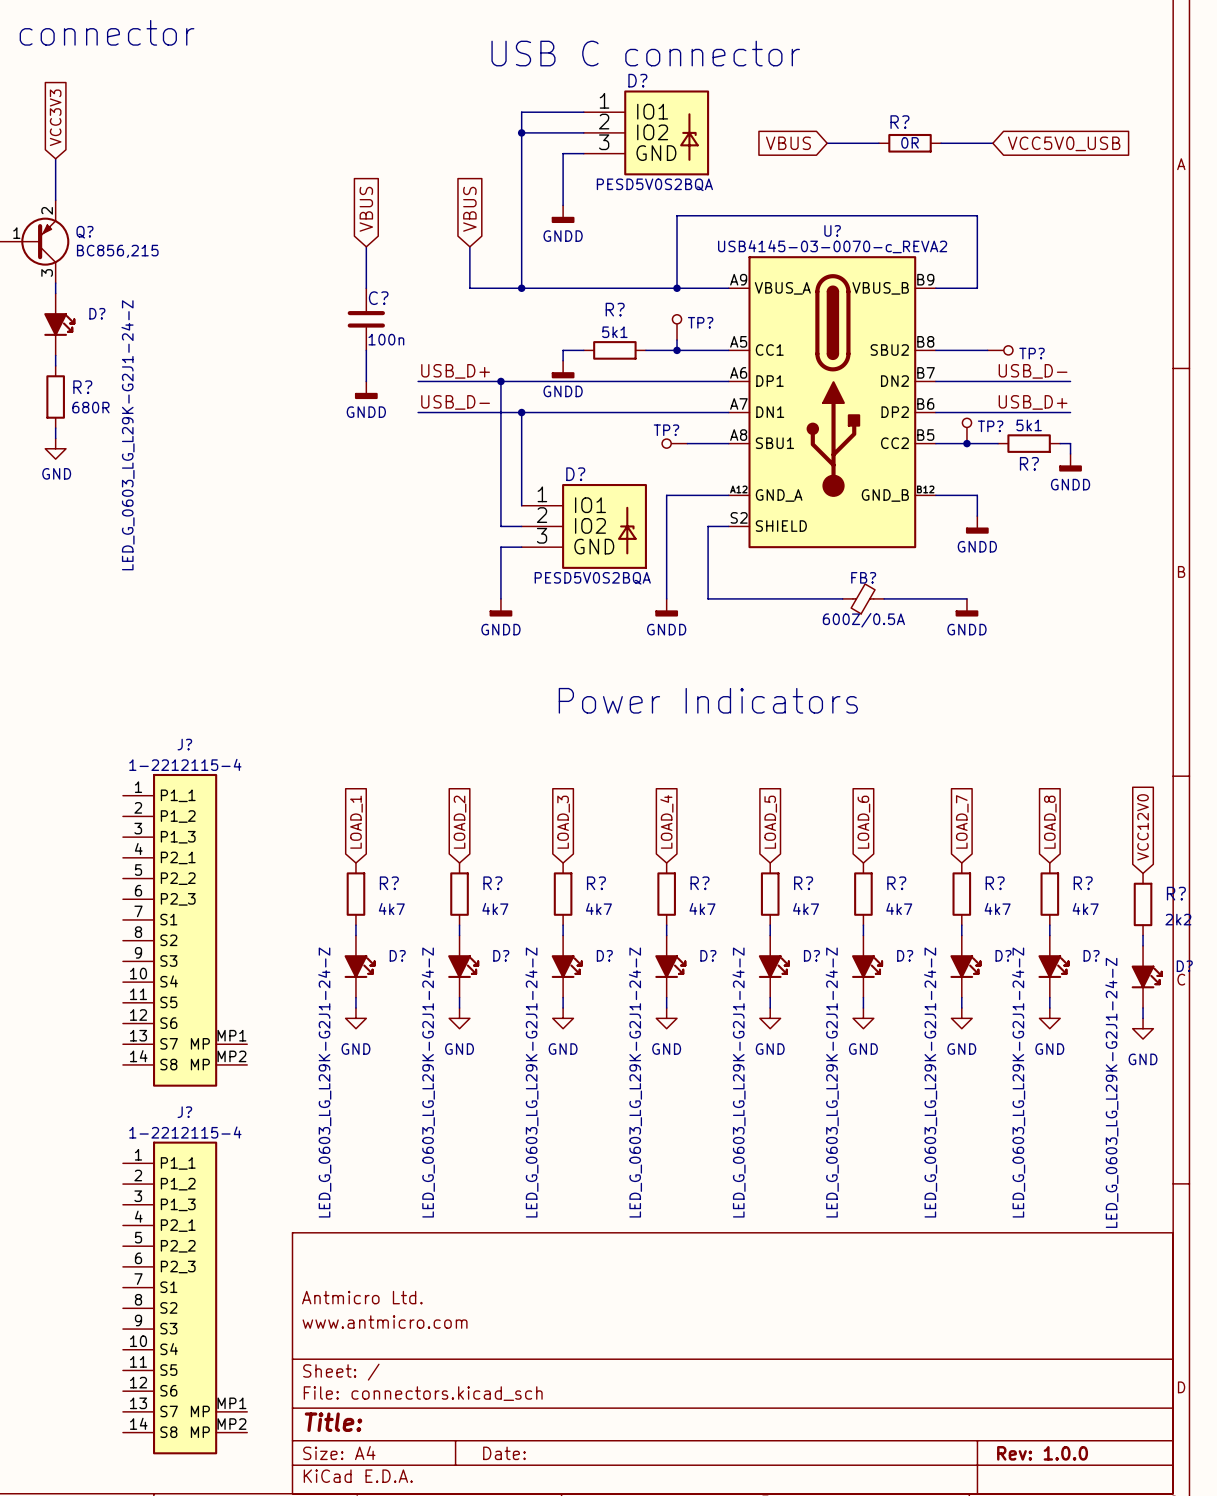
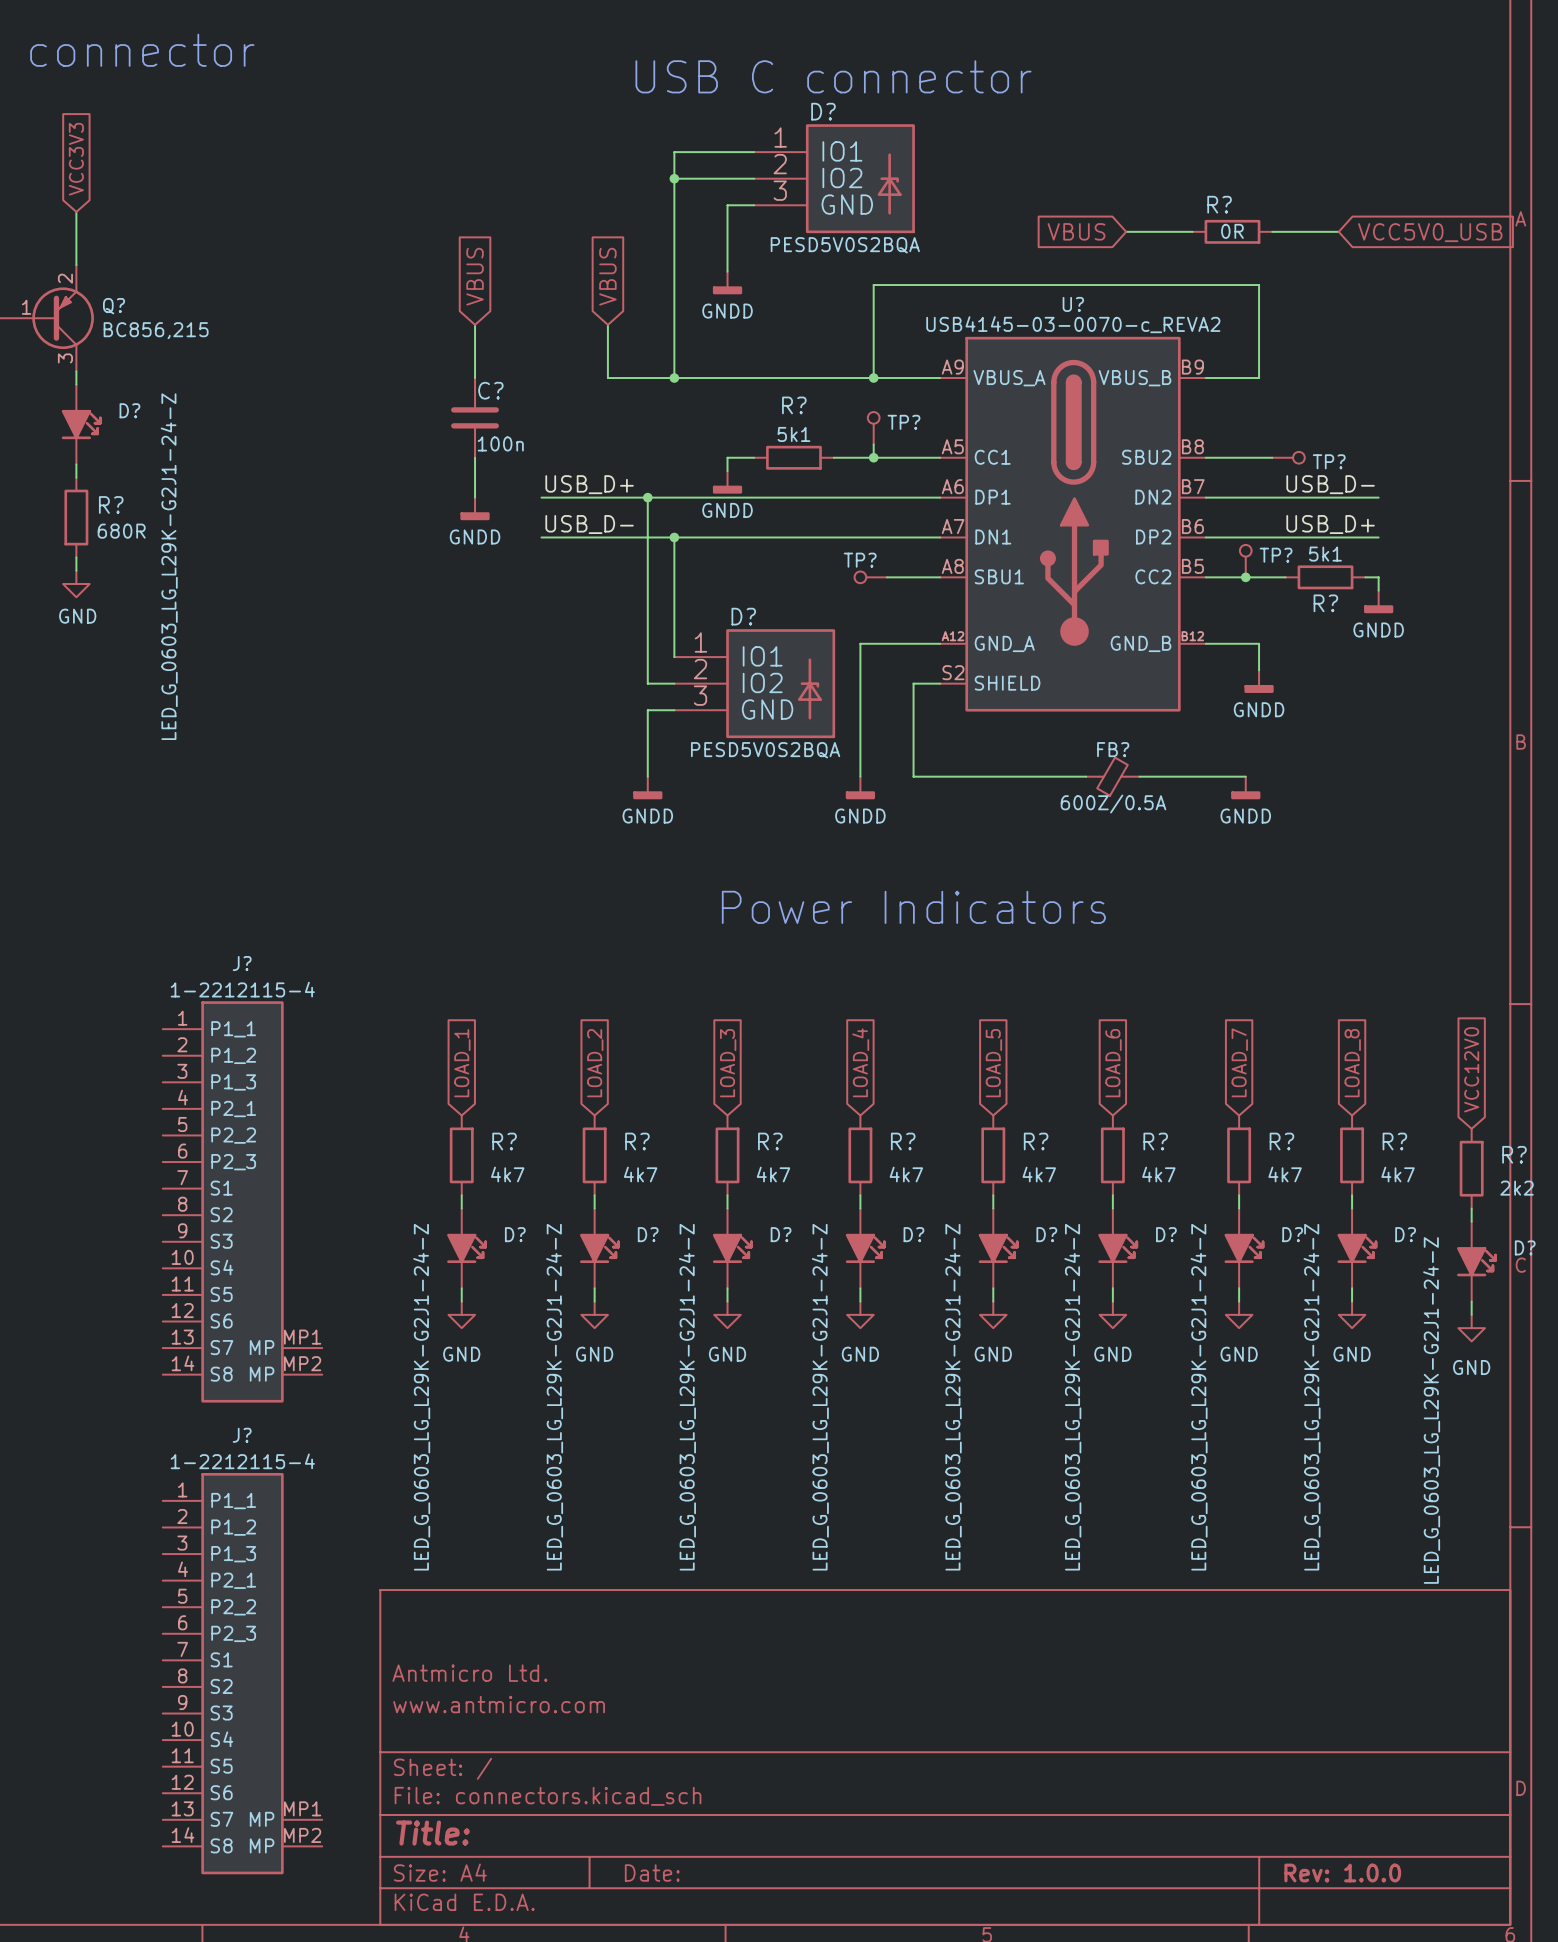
global label position: VBUS (788, 143) -> VBUS (1076, 231)
wire: (827, 143) (878, 143) -> (1126, 231) (1192, 231)
R? position: (910, 143) -> (1232, 231)
wire: (941, 143) (992, 143) -> (1272, 231) (1338, 231)
global label position: VCC5V0_USB (1064, 143) -> VCC5V0_USB (1430, 232)

